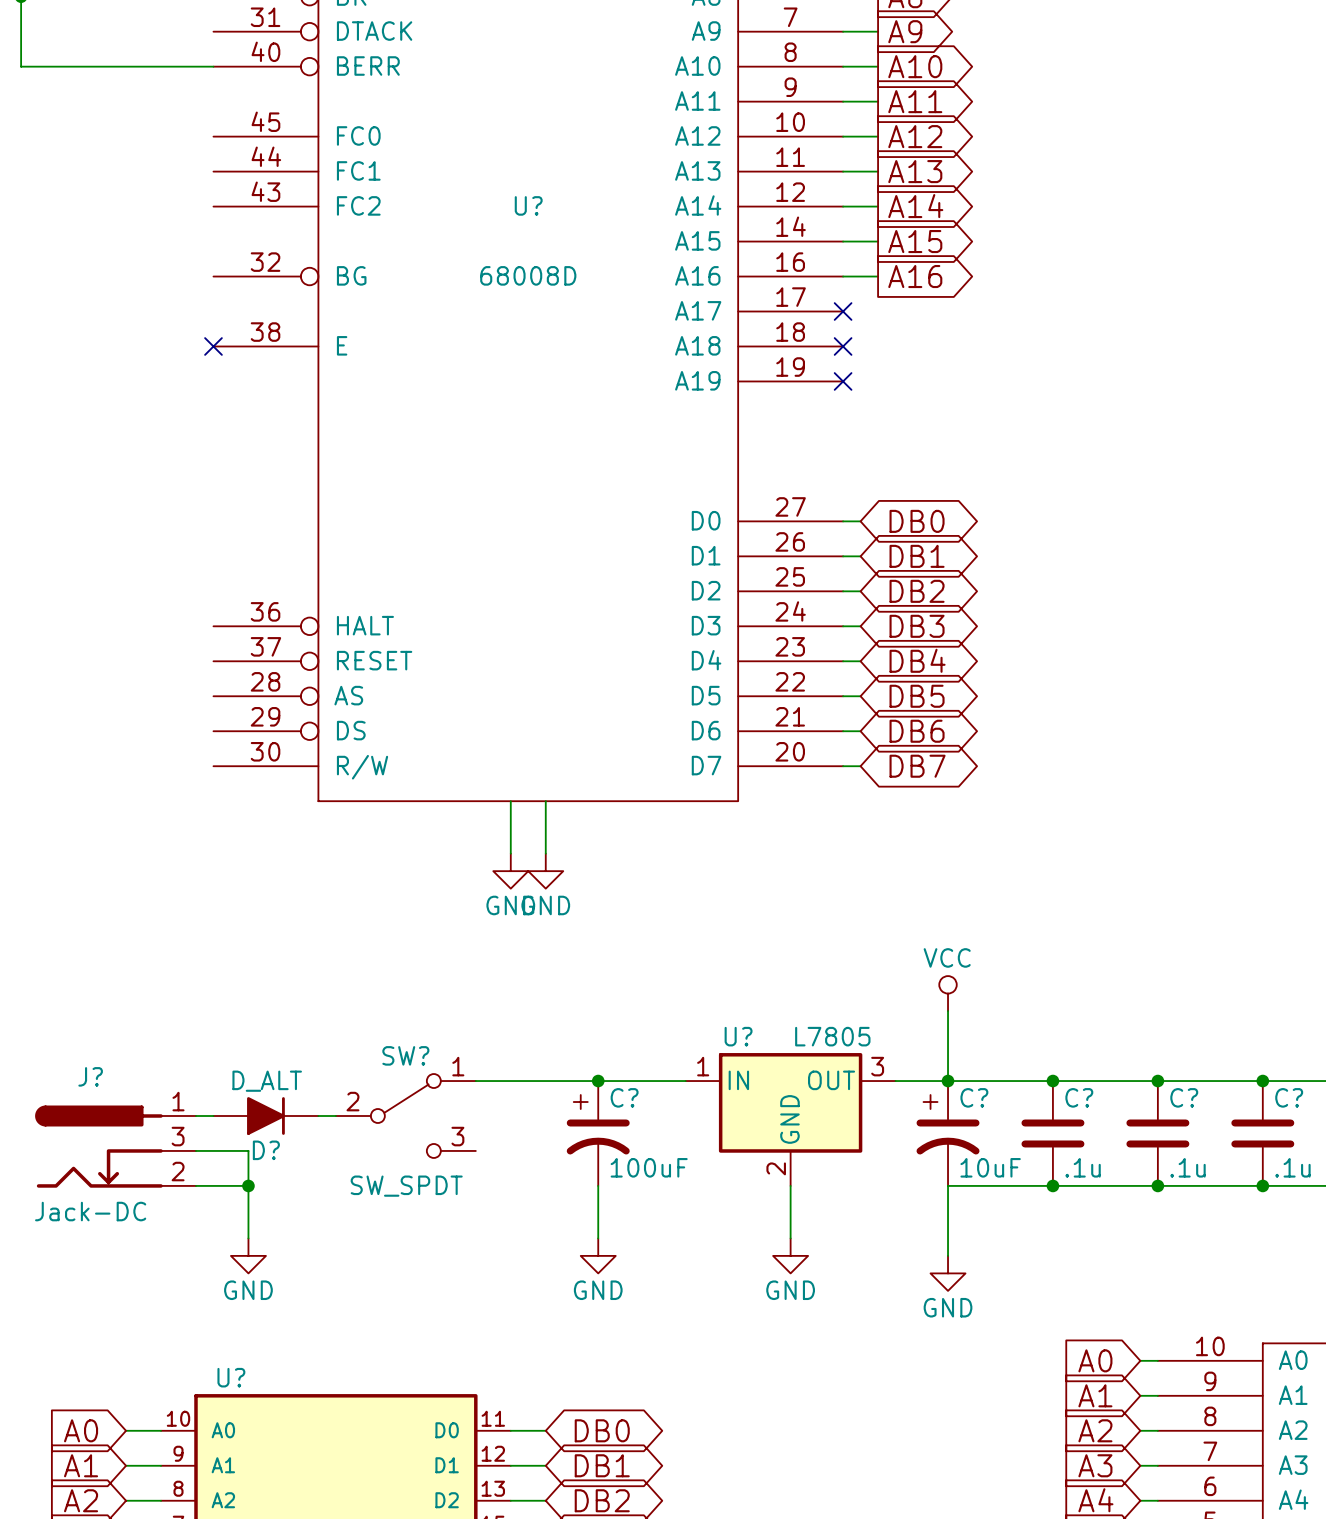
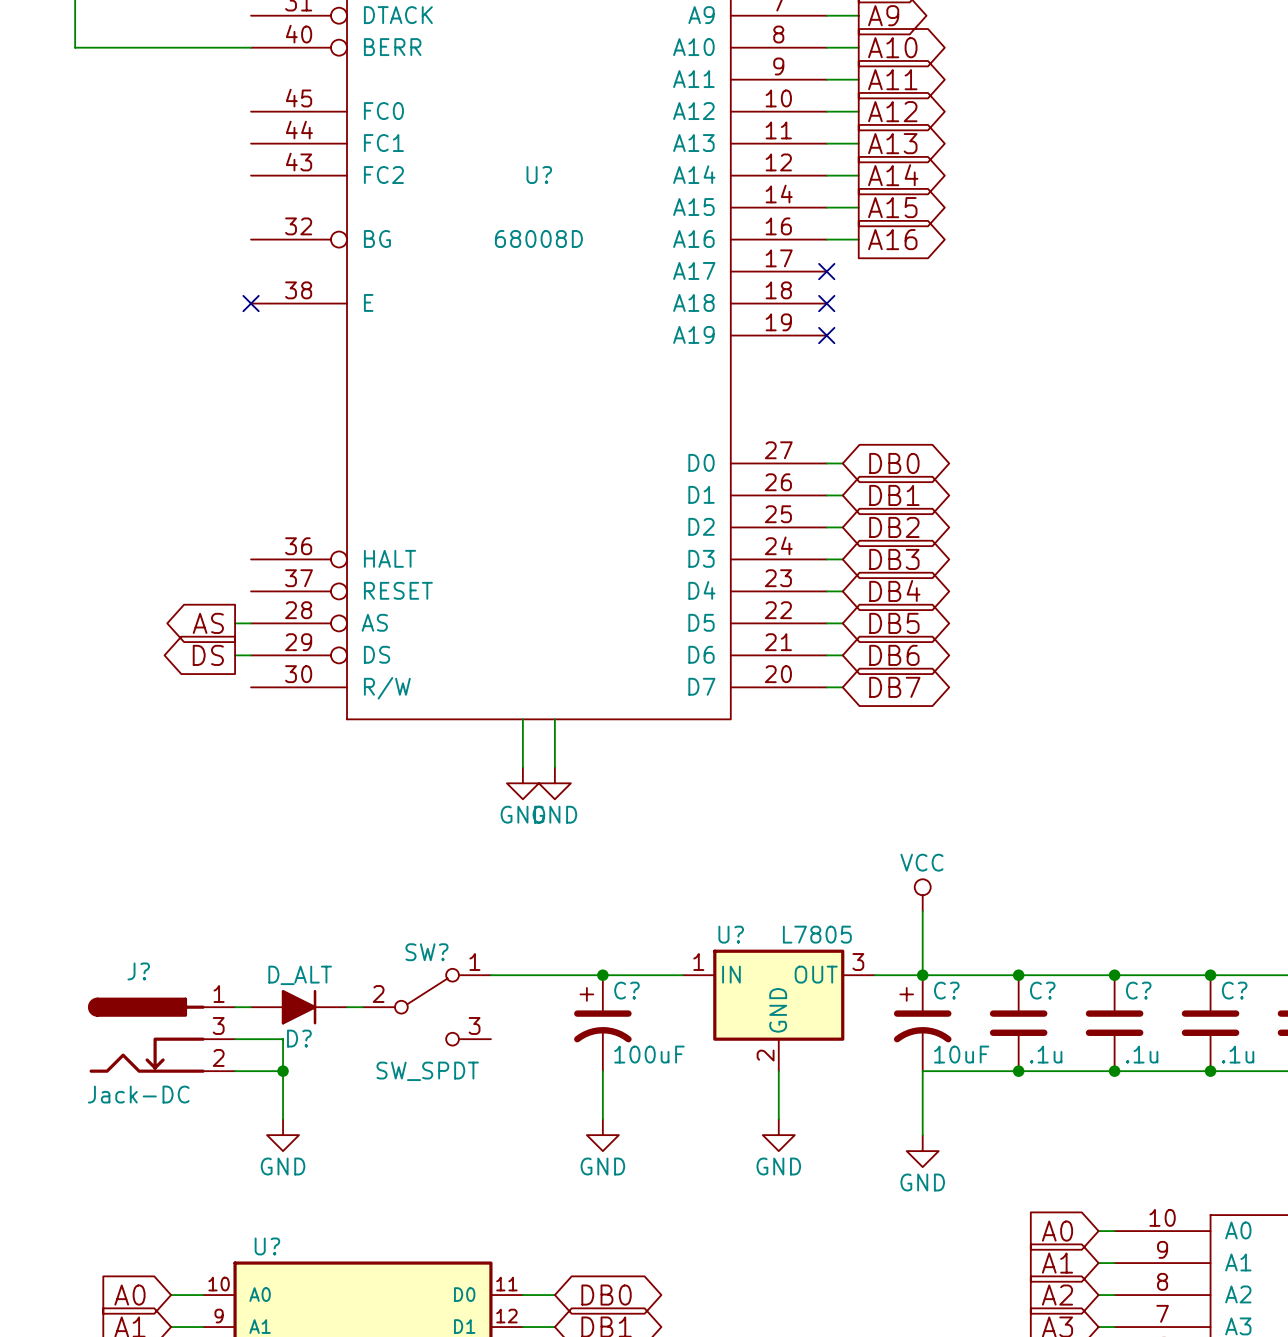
global label: none -> AS (208, 623)
wire: none -> (235, 623) (251, 623)
global label: none -> DS (208, 655)
wire: none -> (235, 655) (251, 655)

